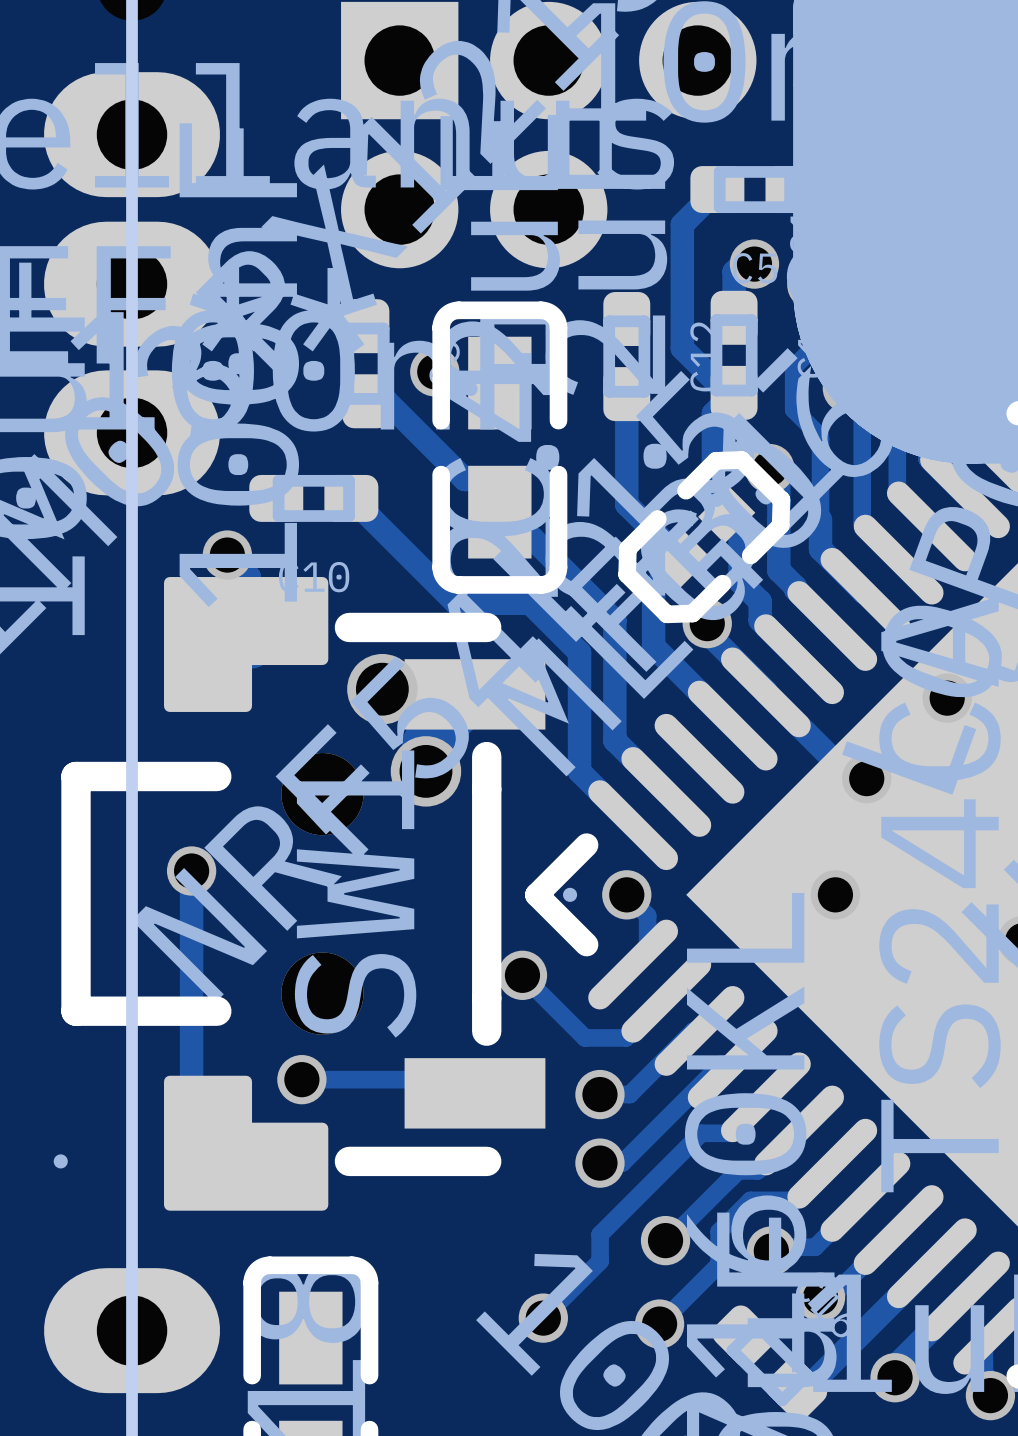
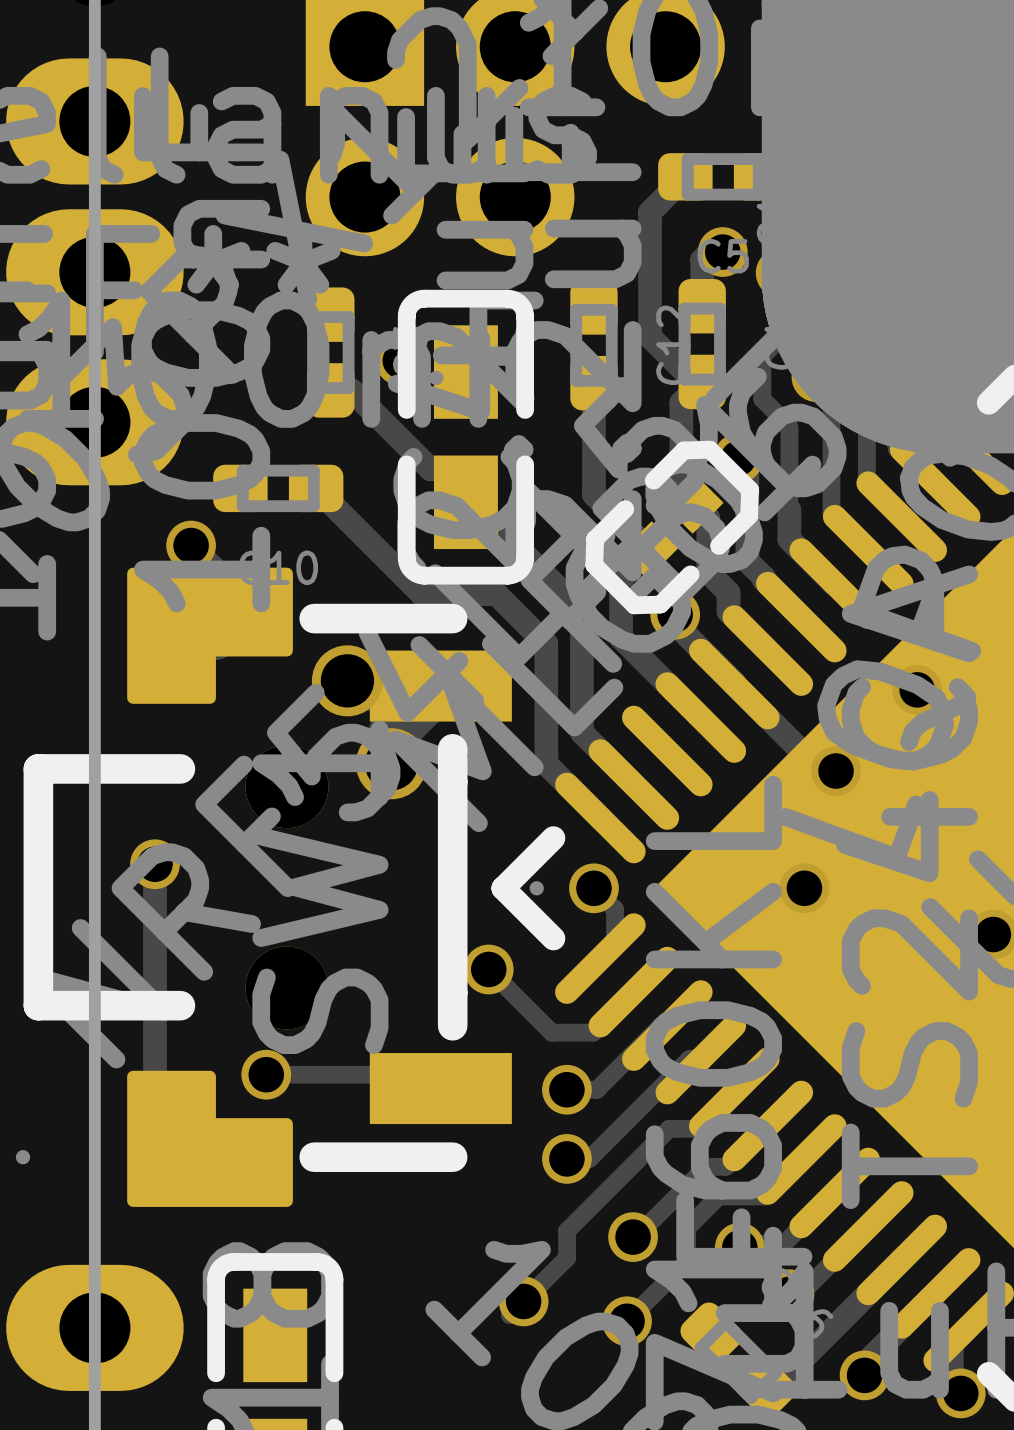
via position: (543, 1318) -> (523, 1301)

